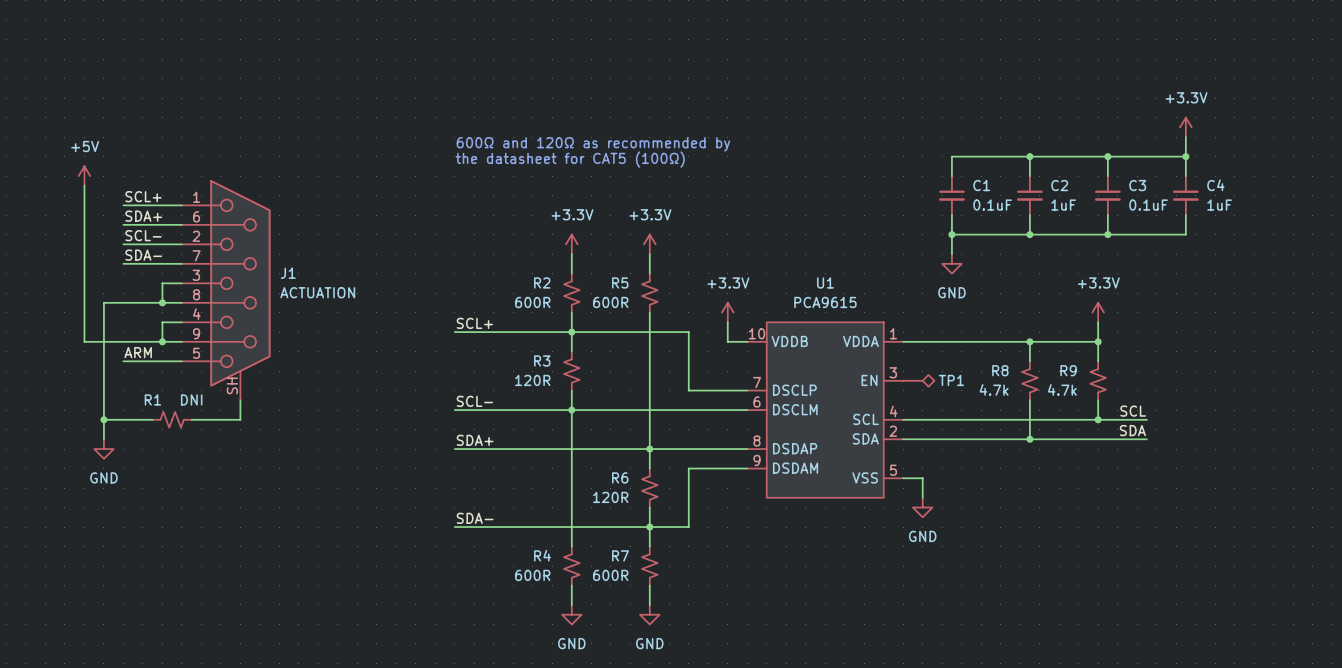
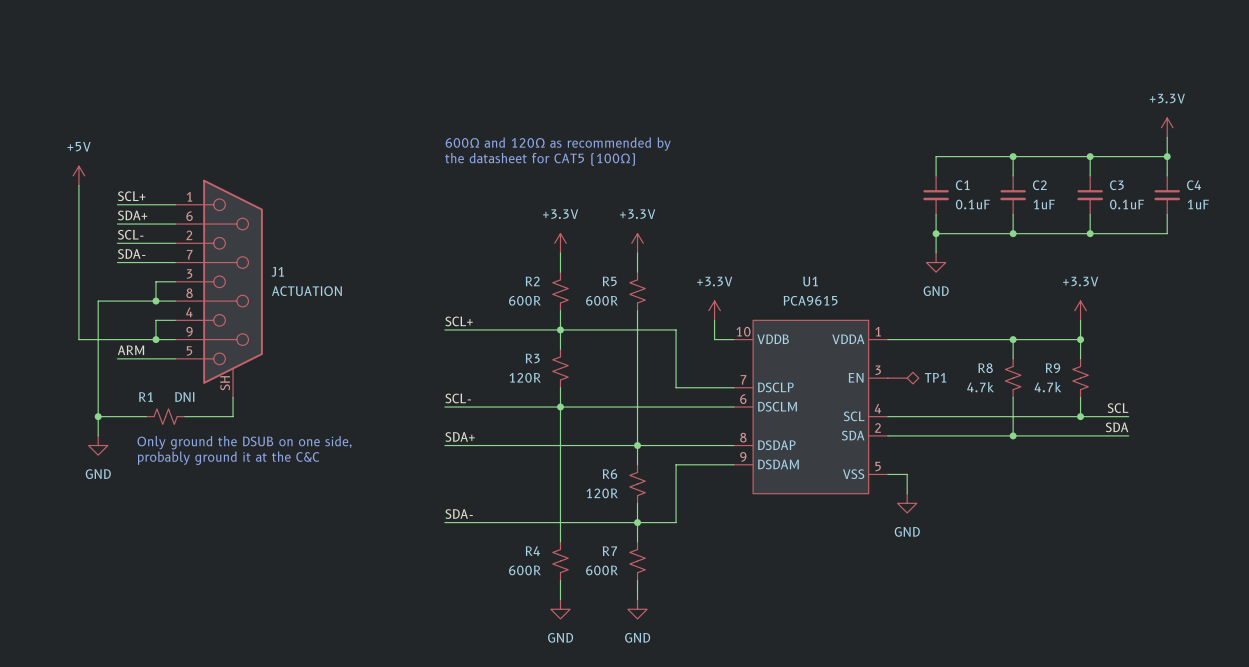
text: none -> Only ground the DSUB on one side, (244, 442)
text: none -> probably ground it at the C&C (228, 458)

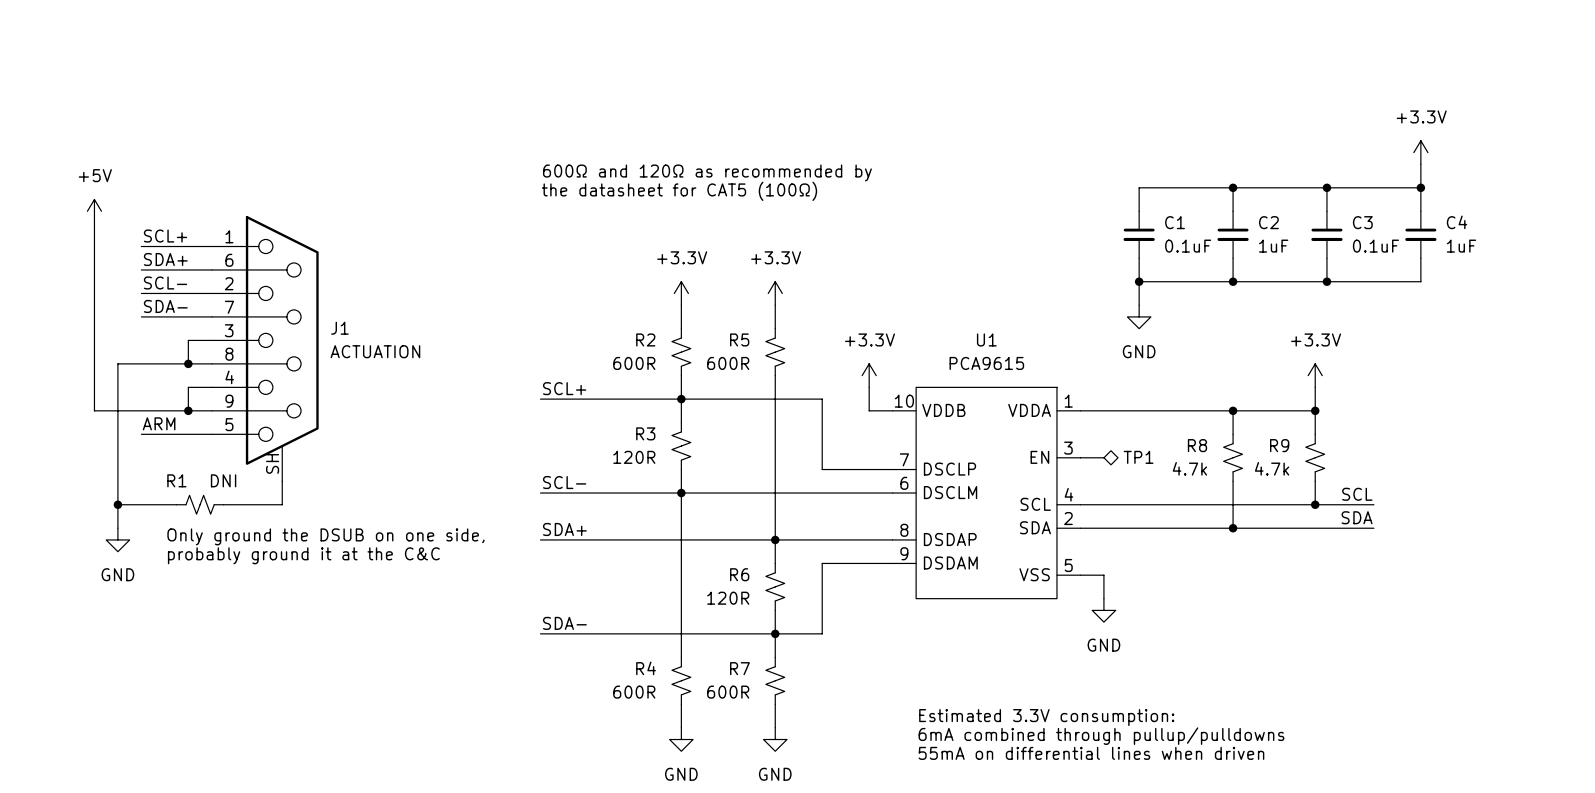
text: none -> Estimated 3.3V consumption: (1046, 717)
text: none -> 6mA combined through pullup/pulldowns (1101, 736)
text: none -> 55mA on differential lines when driven (1091, 753)

